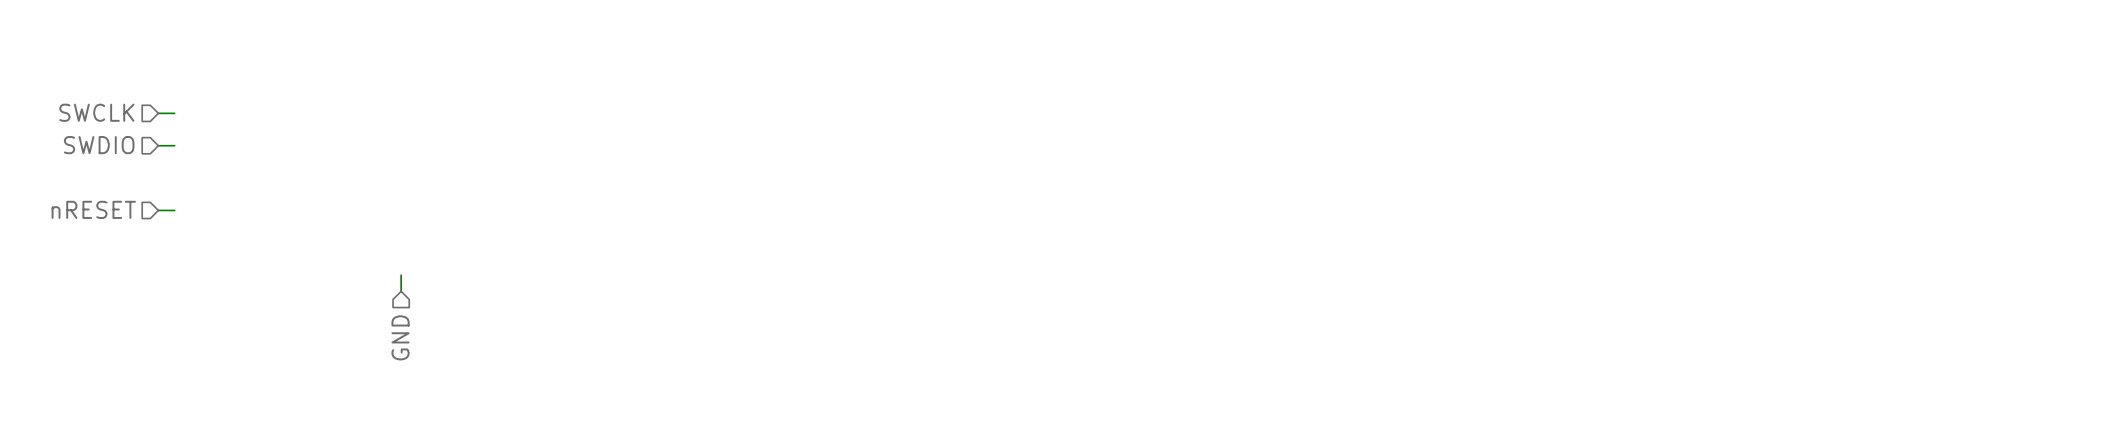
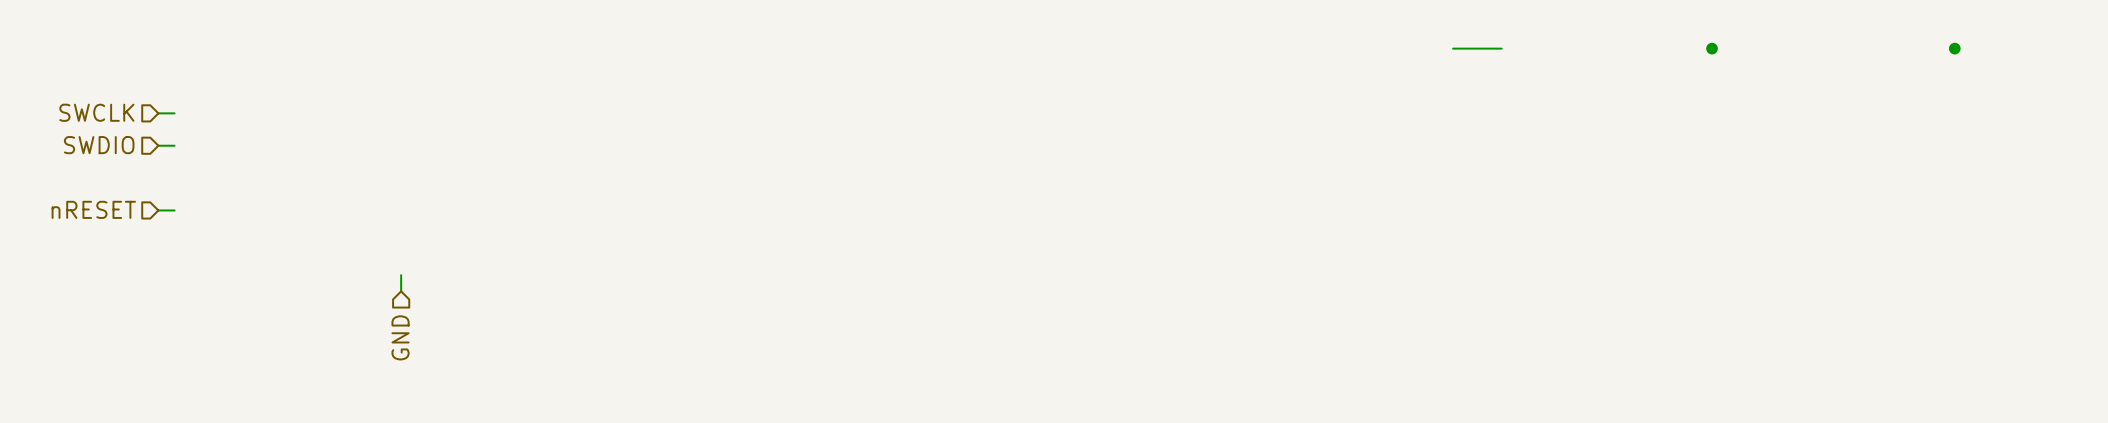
wire: none -> (1453, 48) (1501, 48)
junction: none -> (1712, 48)
junction: none -> (1954, 48)

